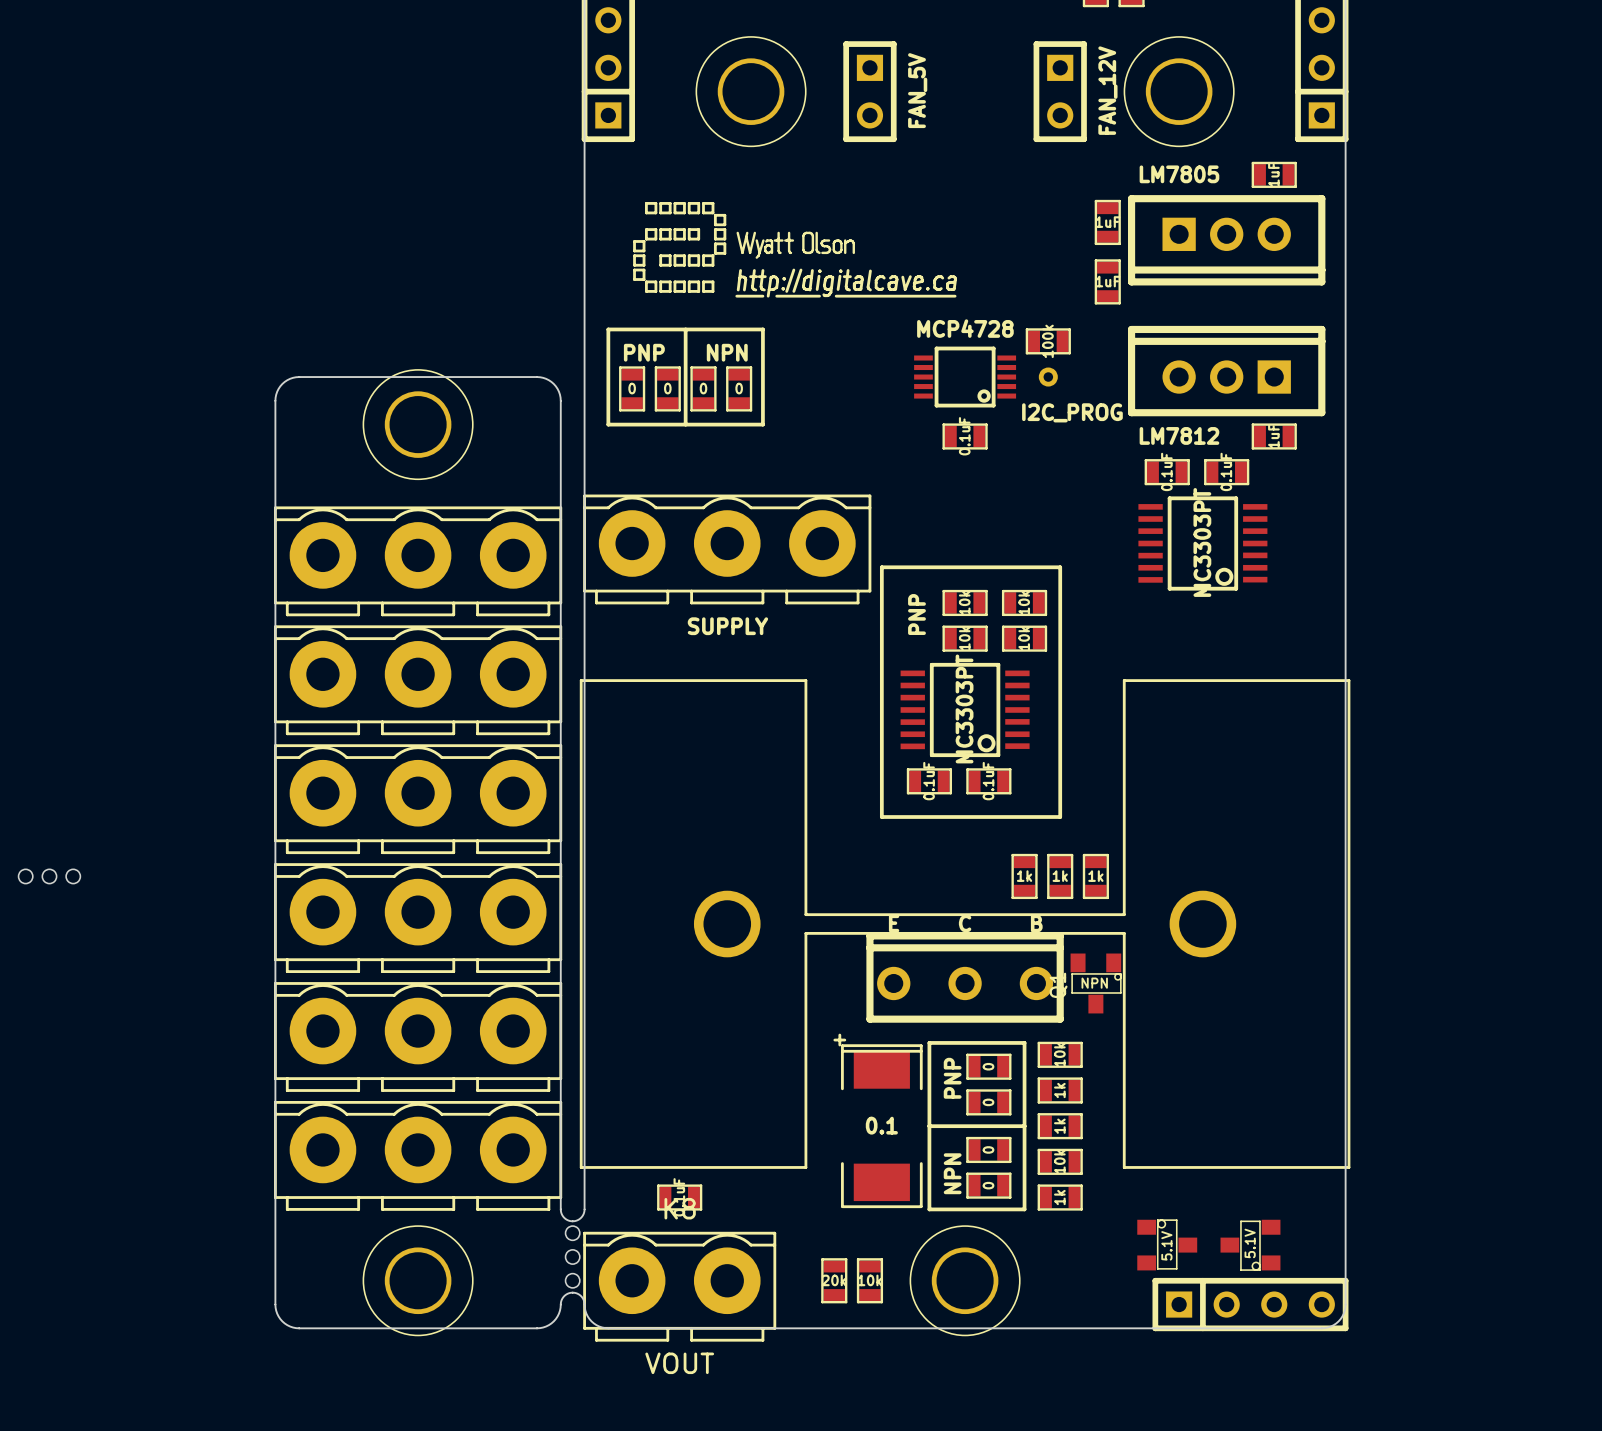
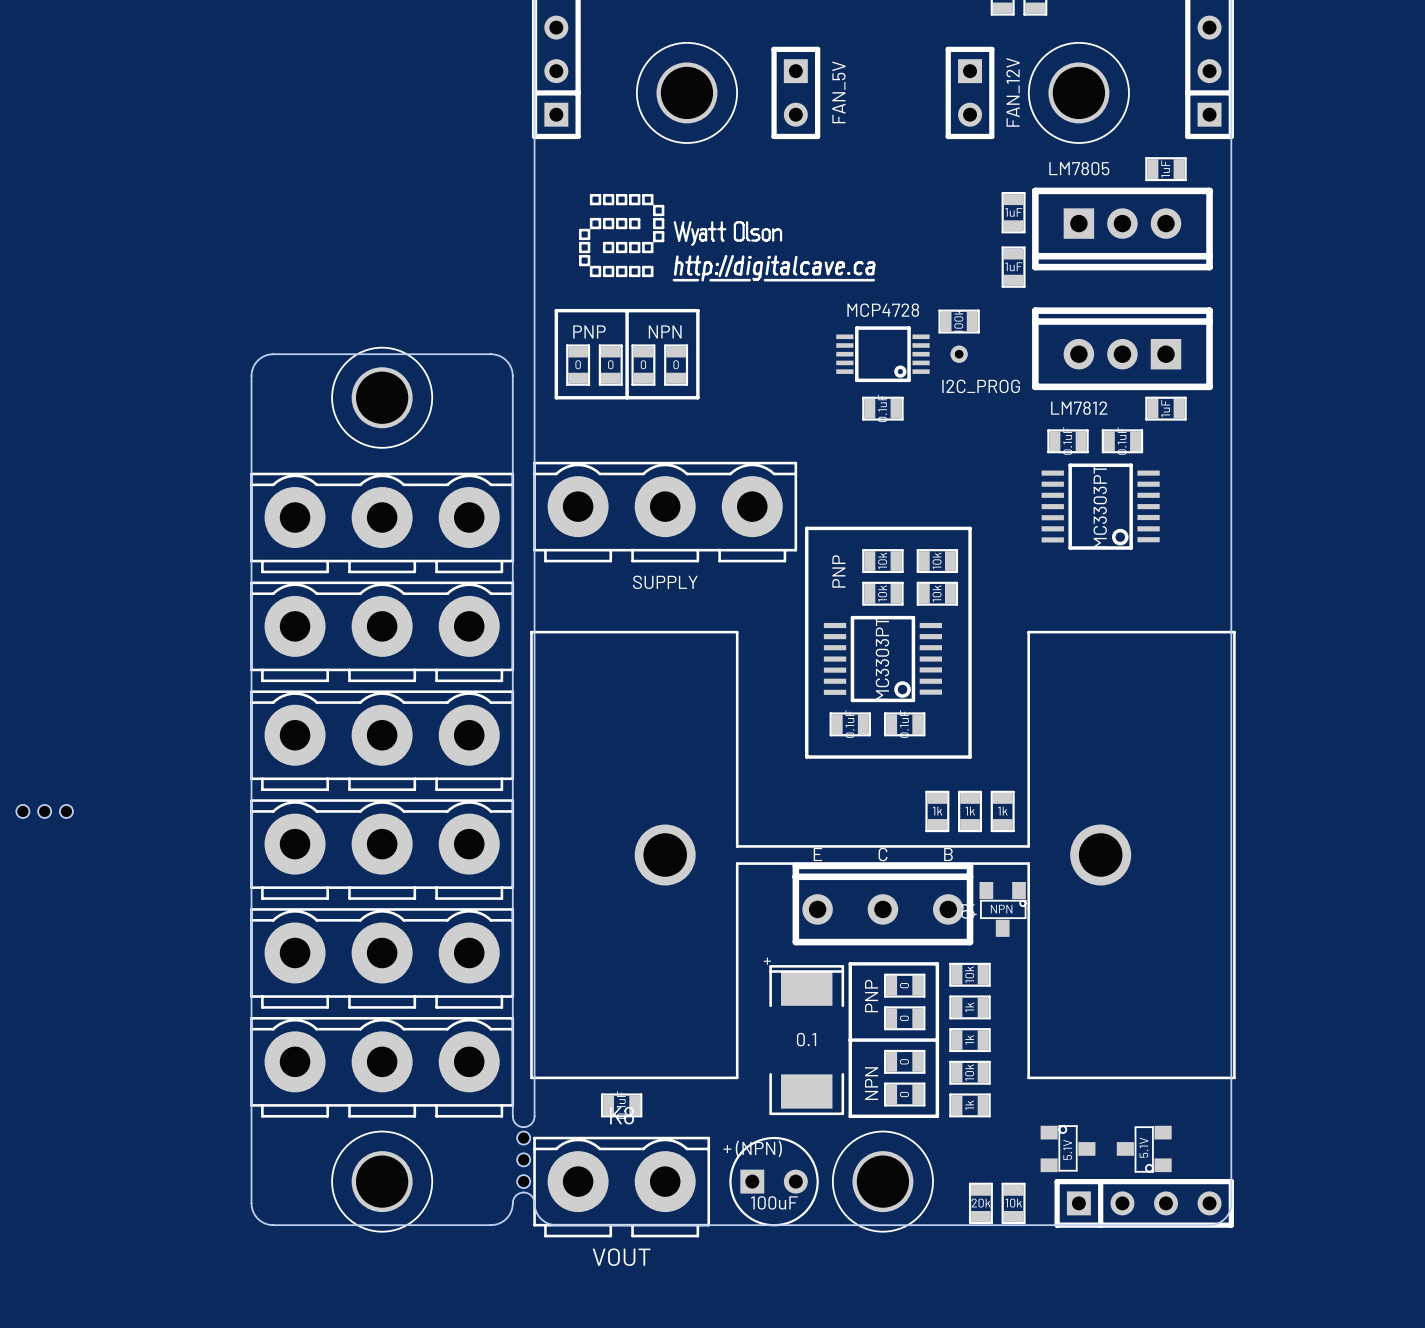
part position: (834, 1280) -> (980, 1203)
part: none -> 100uF (774, 1181)
part position: (869, 1280) -> (1013, 1203)

